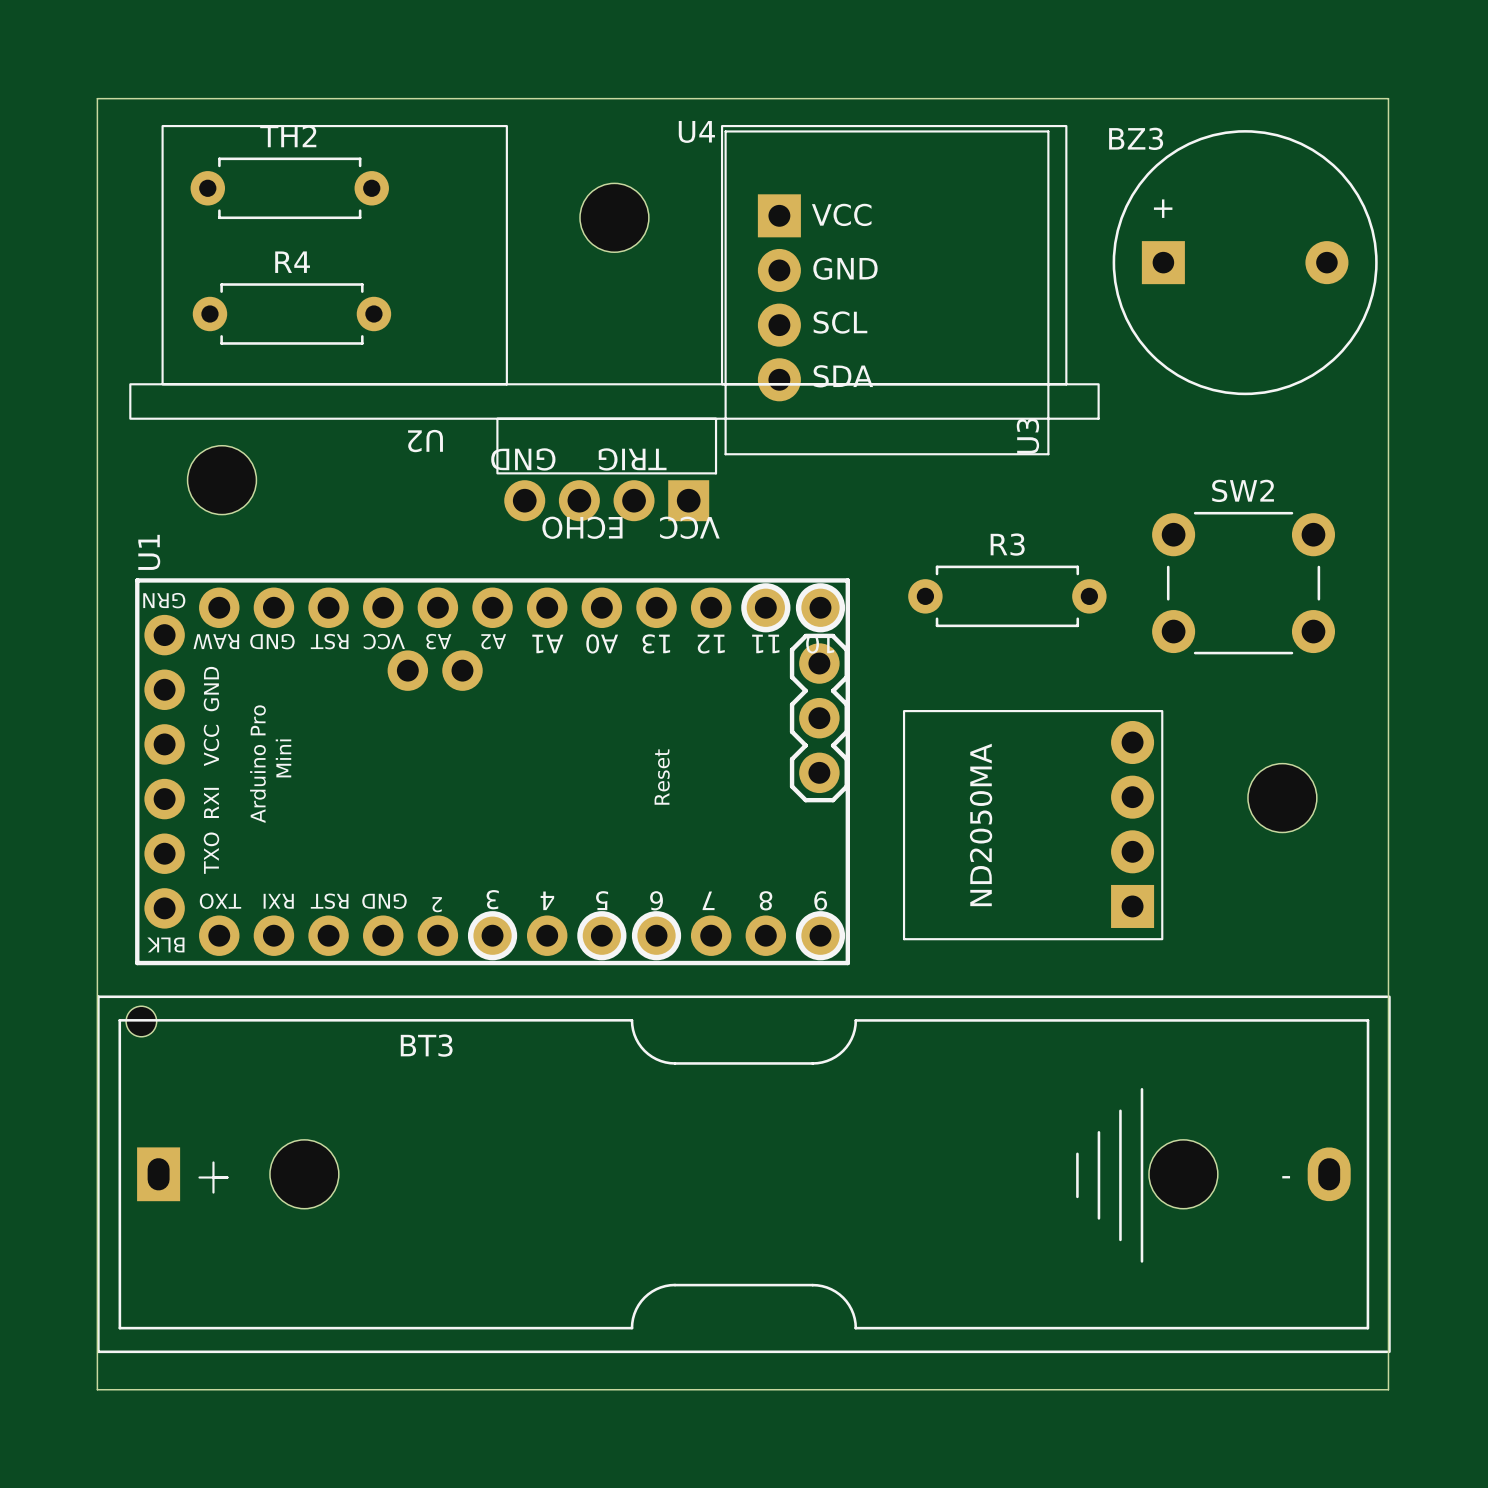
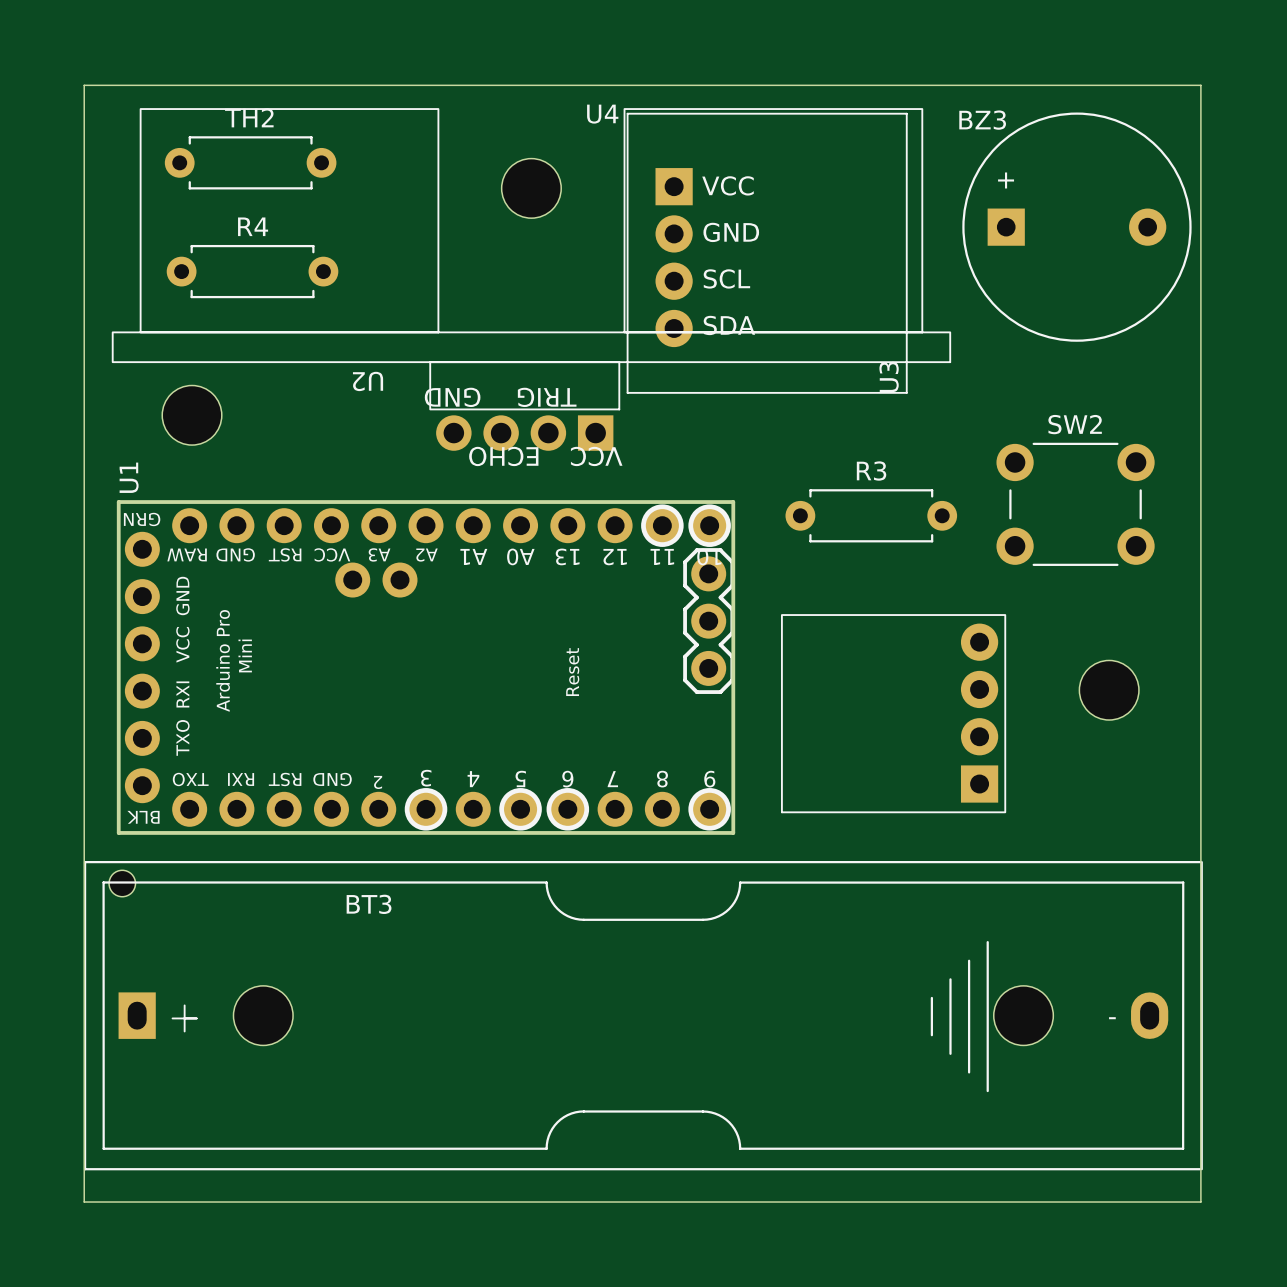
U1 footprint: [135, 578, 851, 966] -> [116, 500, 736, 835]
U3 text: ND2050MA (981, 824) -> none

